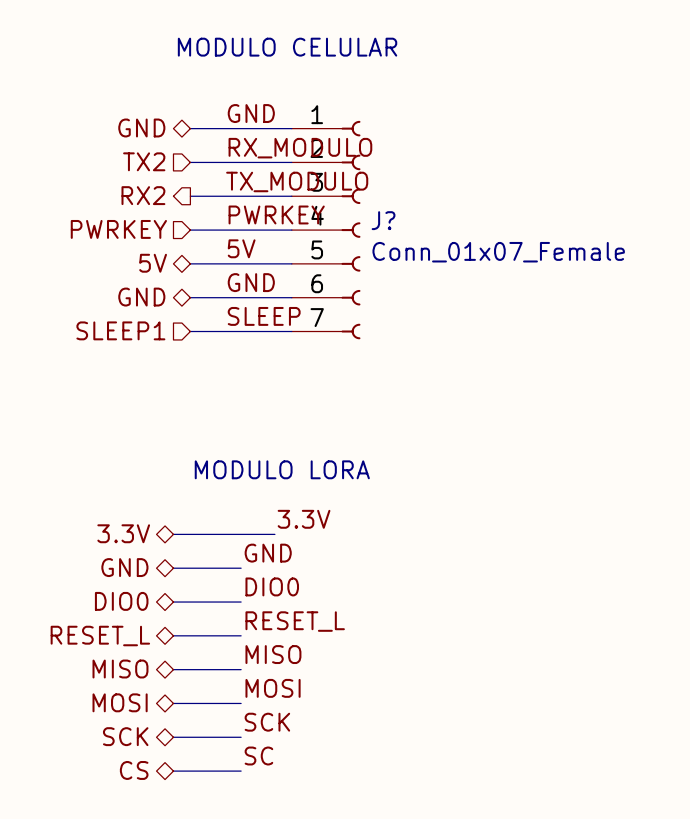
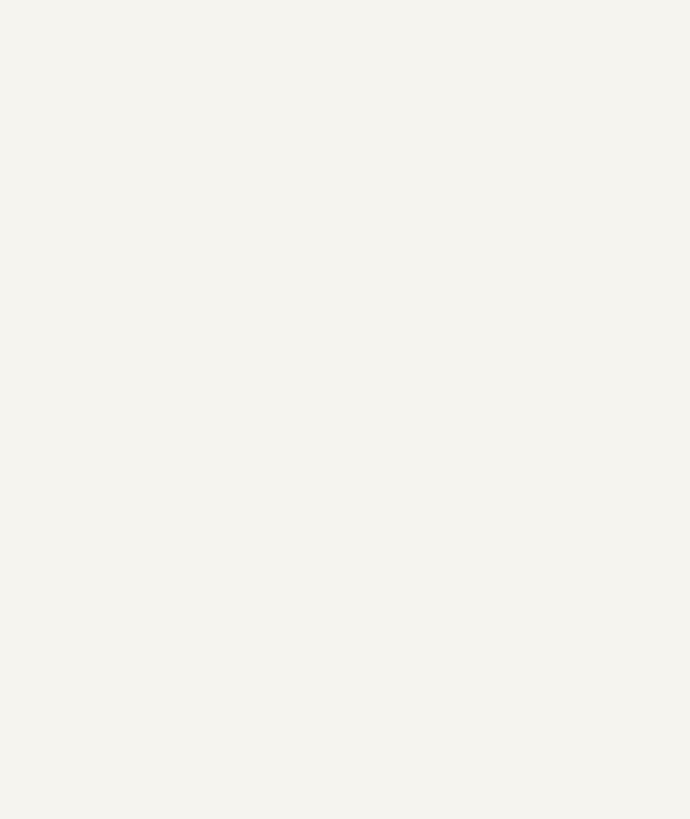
text: MODULO CELULAR (287, 47) -> none
label: GND (251, 113) -> none
hierarchical label: GND (141, 127) -> none
wire: (190, 128) (291, 128) -> none
label: RX_MODULO (300, 148) -> none
hierarchical label: TX2 (144, 161) -> none
wire: (190, 162) (291, 162) -> none
label: TX_MODULO (297, 181) -> none
hierarchical label: RX2 (143, 195) -> none
wire: (190, 196) (291, 196) -> none
label: PWRKEY (276, 214) -> none
hierarchical label: PWRKEY (118, 229) -> none
wire: (190, 230) (291, 230) -> none
J?: Conn_01x07_Female (326, 230) -> none
label: 5V (241, 248) -> none
hierarchical label: 5V (153, 263) -> none
wire: (190, 263) (291, 263) -> none
label: GND (251, 282) -> none
hierarchical label: GND (141, 297) -> none
wire: (190, 297) (291, 297) -> none
label: SLEEP (264, 316) -> none
hierarchical label: SLEEP1 (120, 330) -> none
wire: (190, 331) (291, 331) -> none
text: MODULO LORA (282, 469) -> none
label: 3.3V (304, 519) -> none
hierarchical label: 3.3V (123, 533) -> none
wire: (173, 534) (274, 534) -> none
label: GND (268, 553) -> none
hierarchical label: GND (124, 567) -> none
wire: (173, 568) (241, 568) -> none
label: DIO0 (272, 586) -> none
hierarchical label: DIO0 (121, 601) -> none
wire: (173, 602) (241, 602) -> none
label: RESET_L (295, 621) -> none
wire: (173, 635) (241, 635) -> none
hierarchical label: RESET_L (100, 636) -> none
label: MISO (273, 654) -> none
hierarchical label: MISO (120, 669) -> none
wire: (173, 669) (241, 669) -> none
label: MOSI (273, 688) -> none
hierarchical label: MOSI (120, 702) -> none
wire: (173, 703) (241, 703) -> none
label: SCK (267, 722) -> none
hierarchical label: SCK (125, 736) -> none
wire: (173, 737) (241, 737) -> none
label: SC (258, 756) -> none
hierarchical label: CS (134, 770) -> none
wire: (173, 771) (241, 771) -> none

